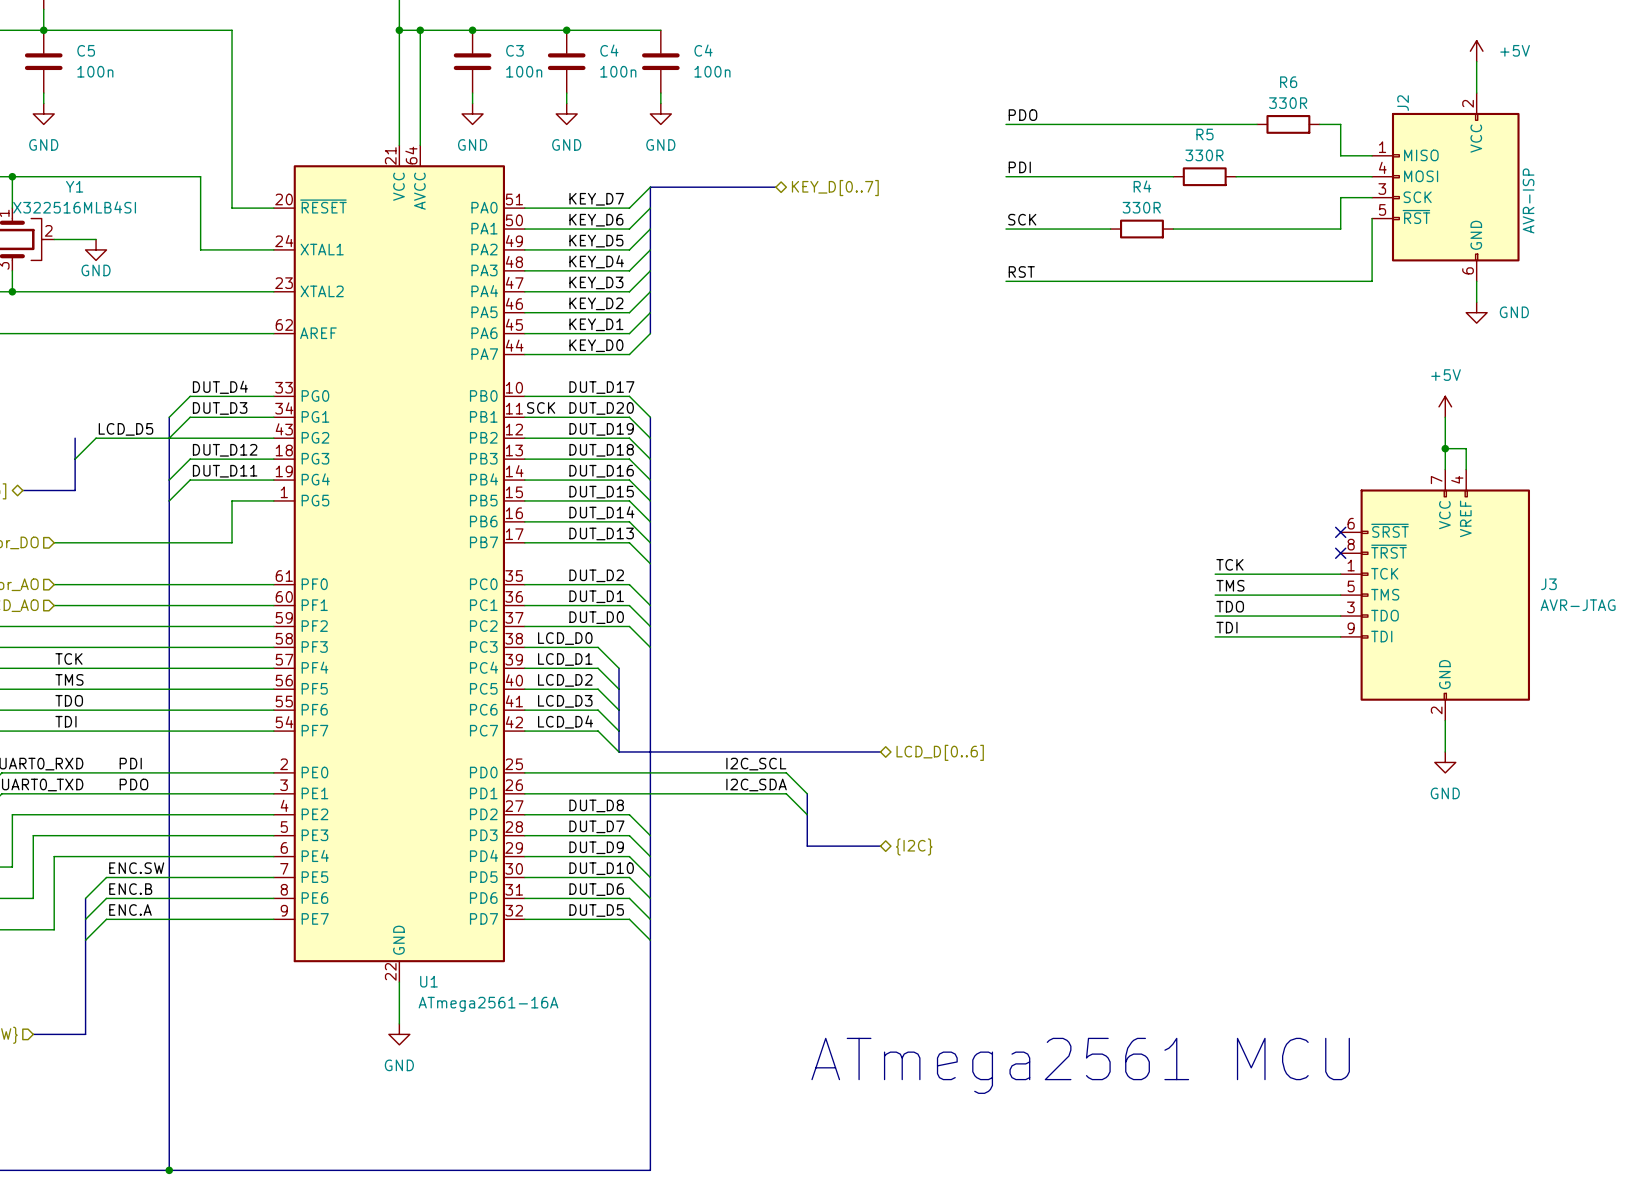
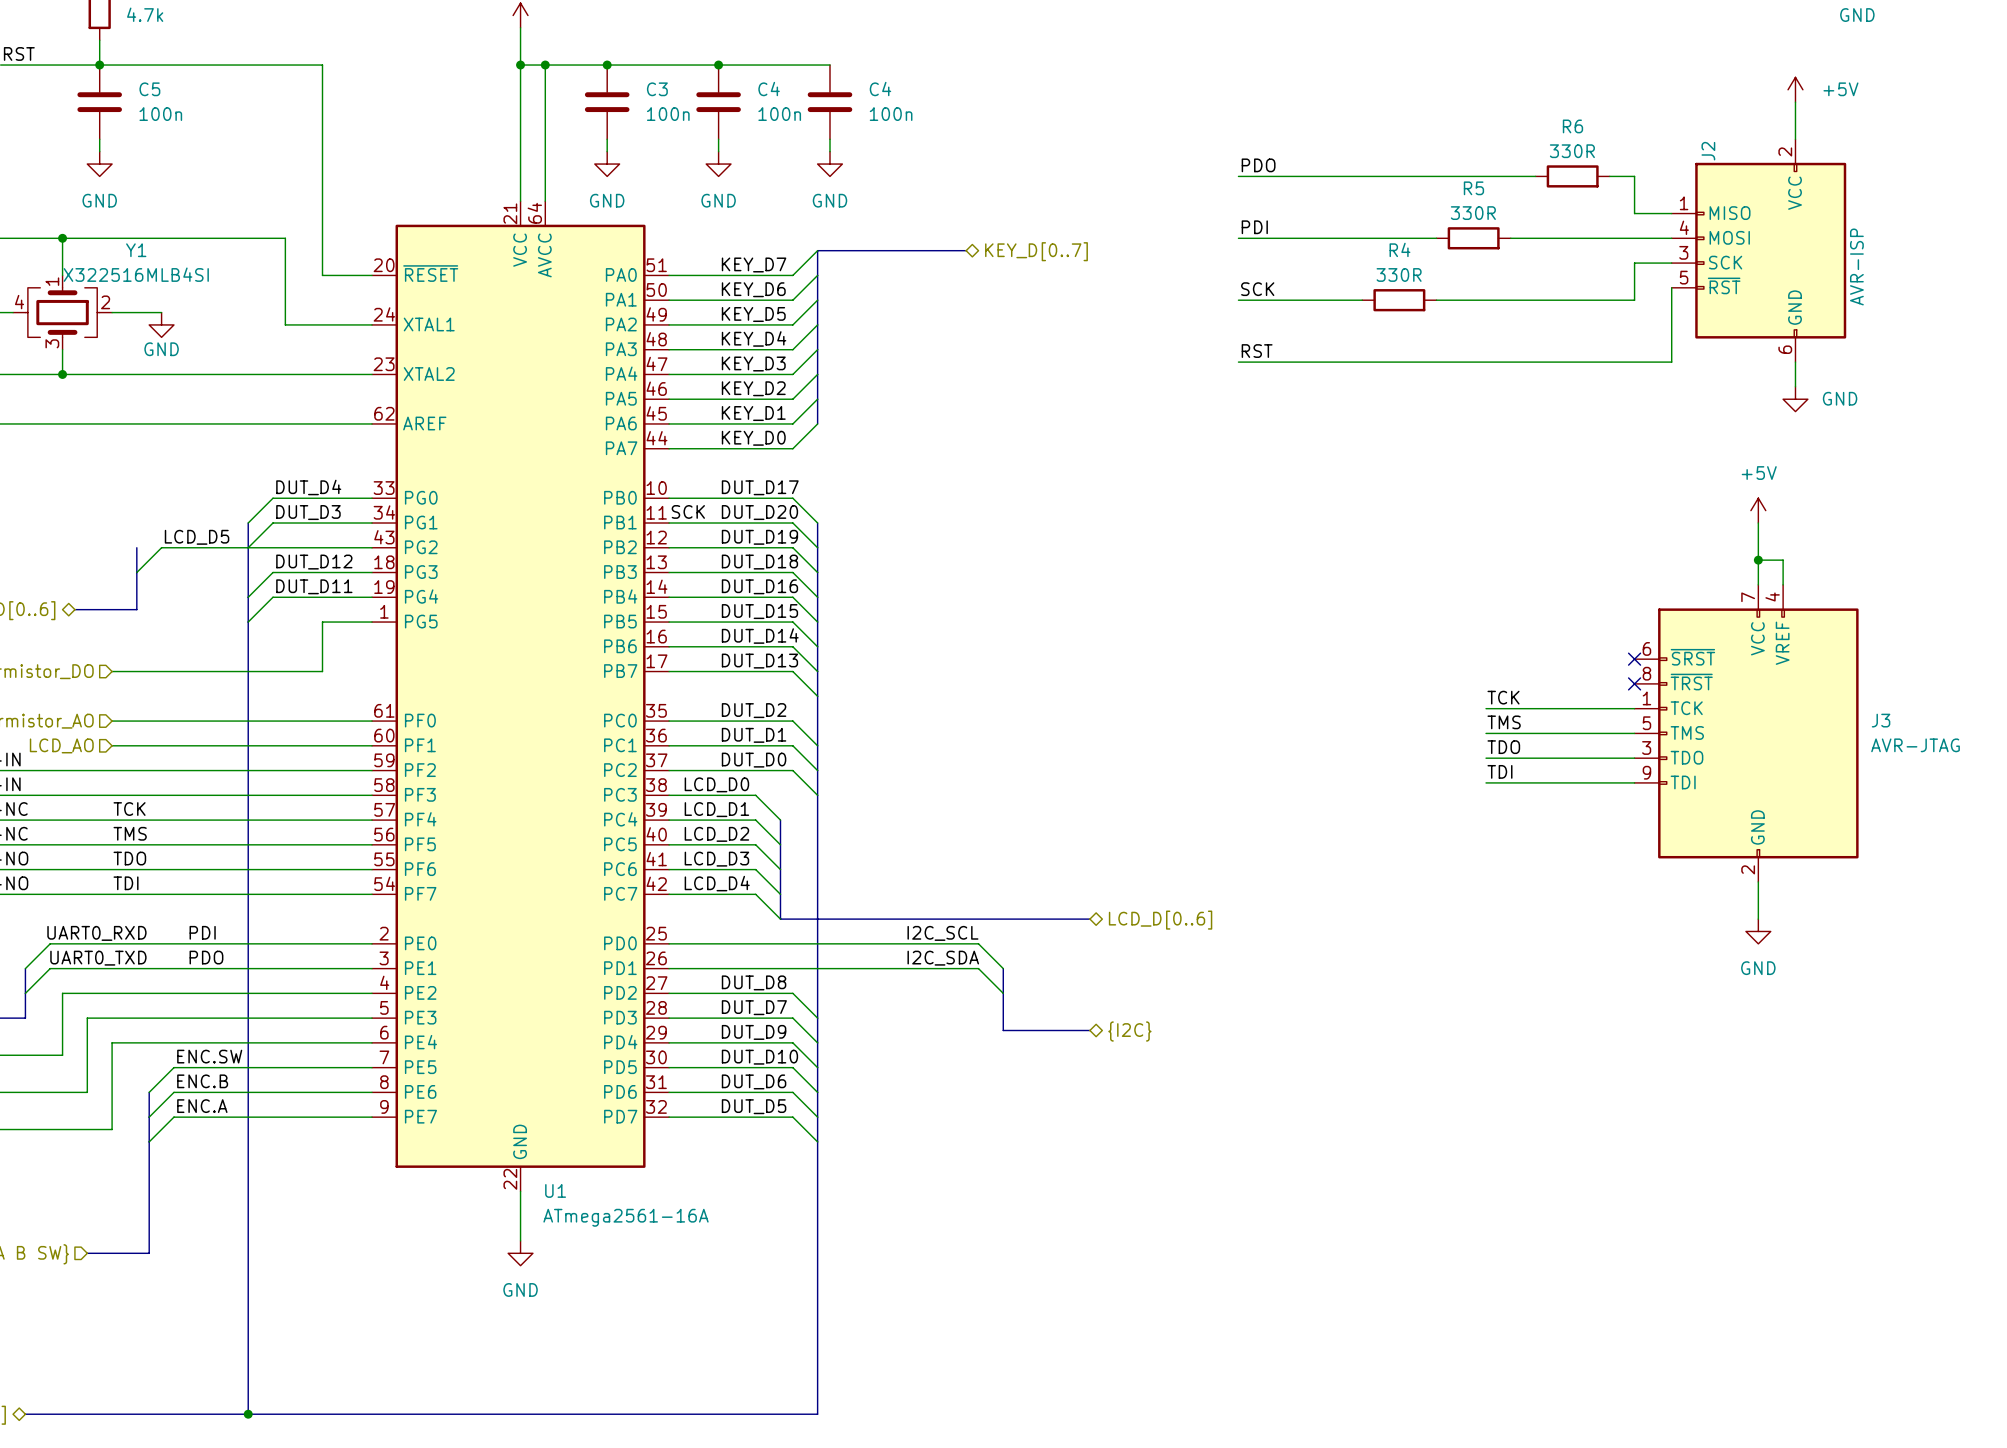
text: ATmega2561 MCU (1080, 1065) -> none

